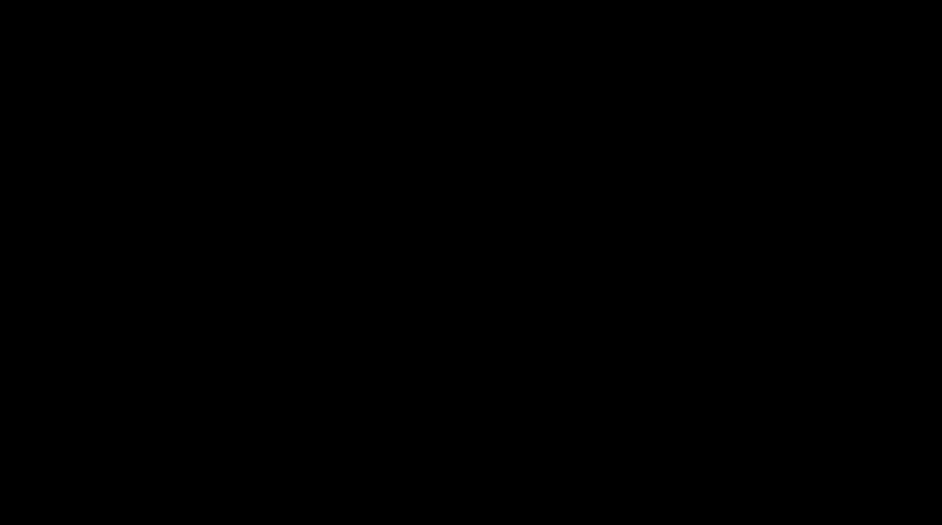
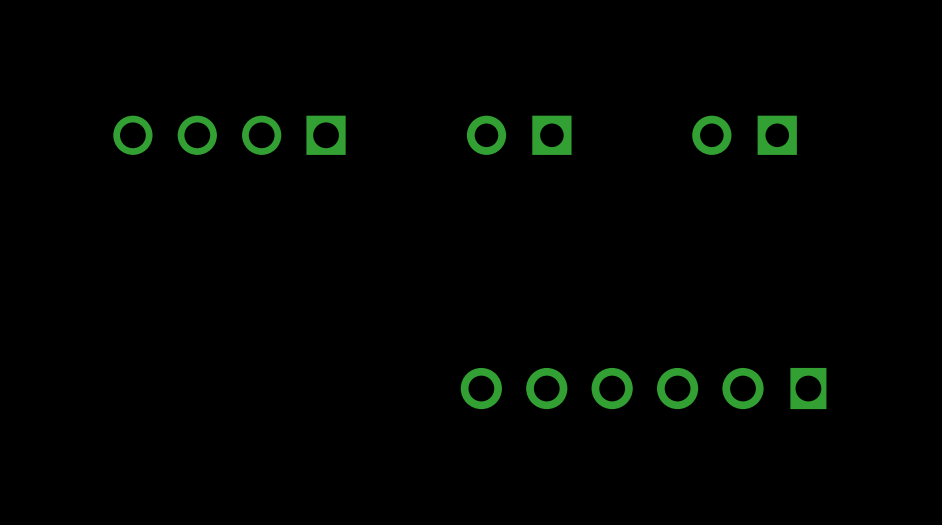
part: none -> (229, 135)
part: none -> (519, 135)
part: none -> (744, 135)
part: none -> (643, 388)

